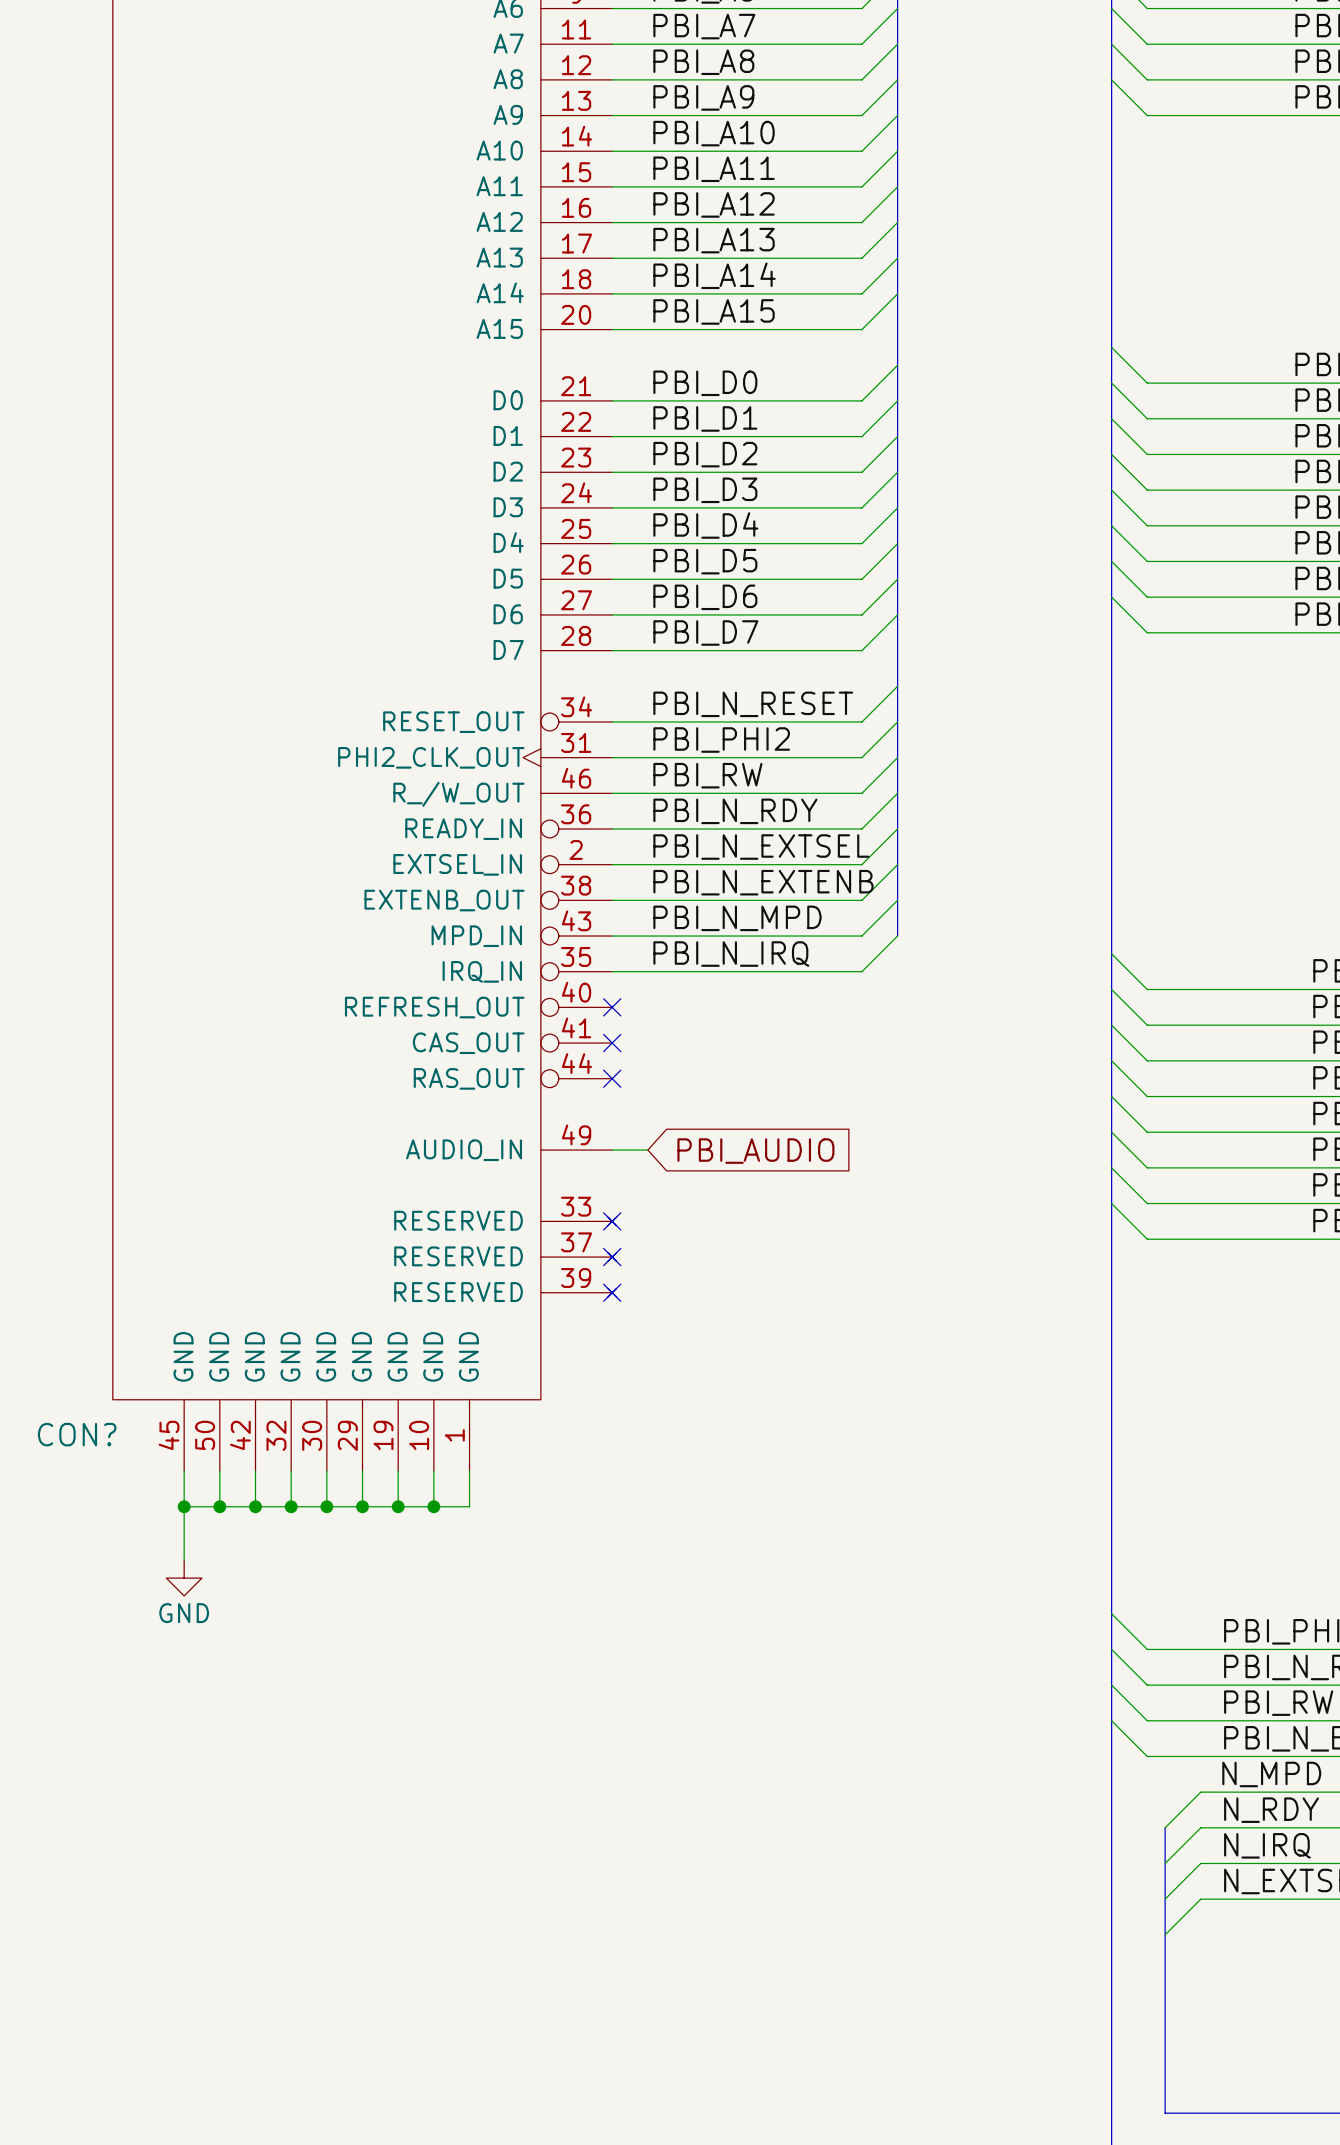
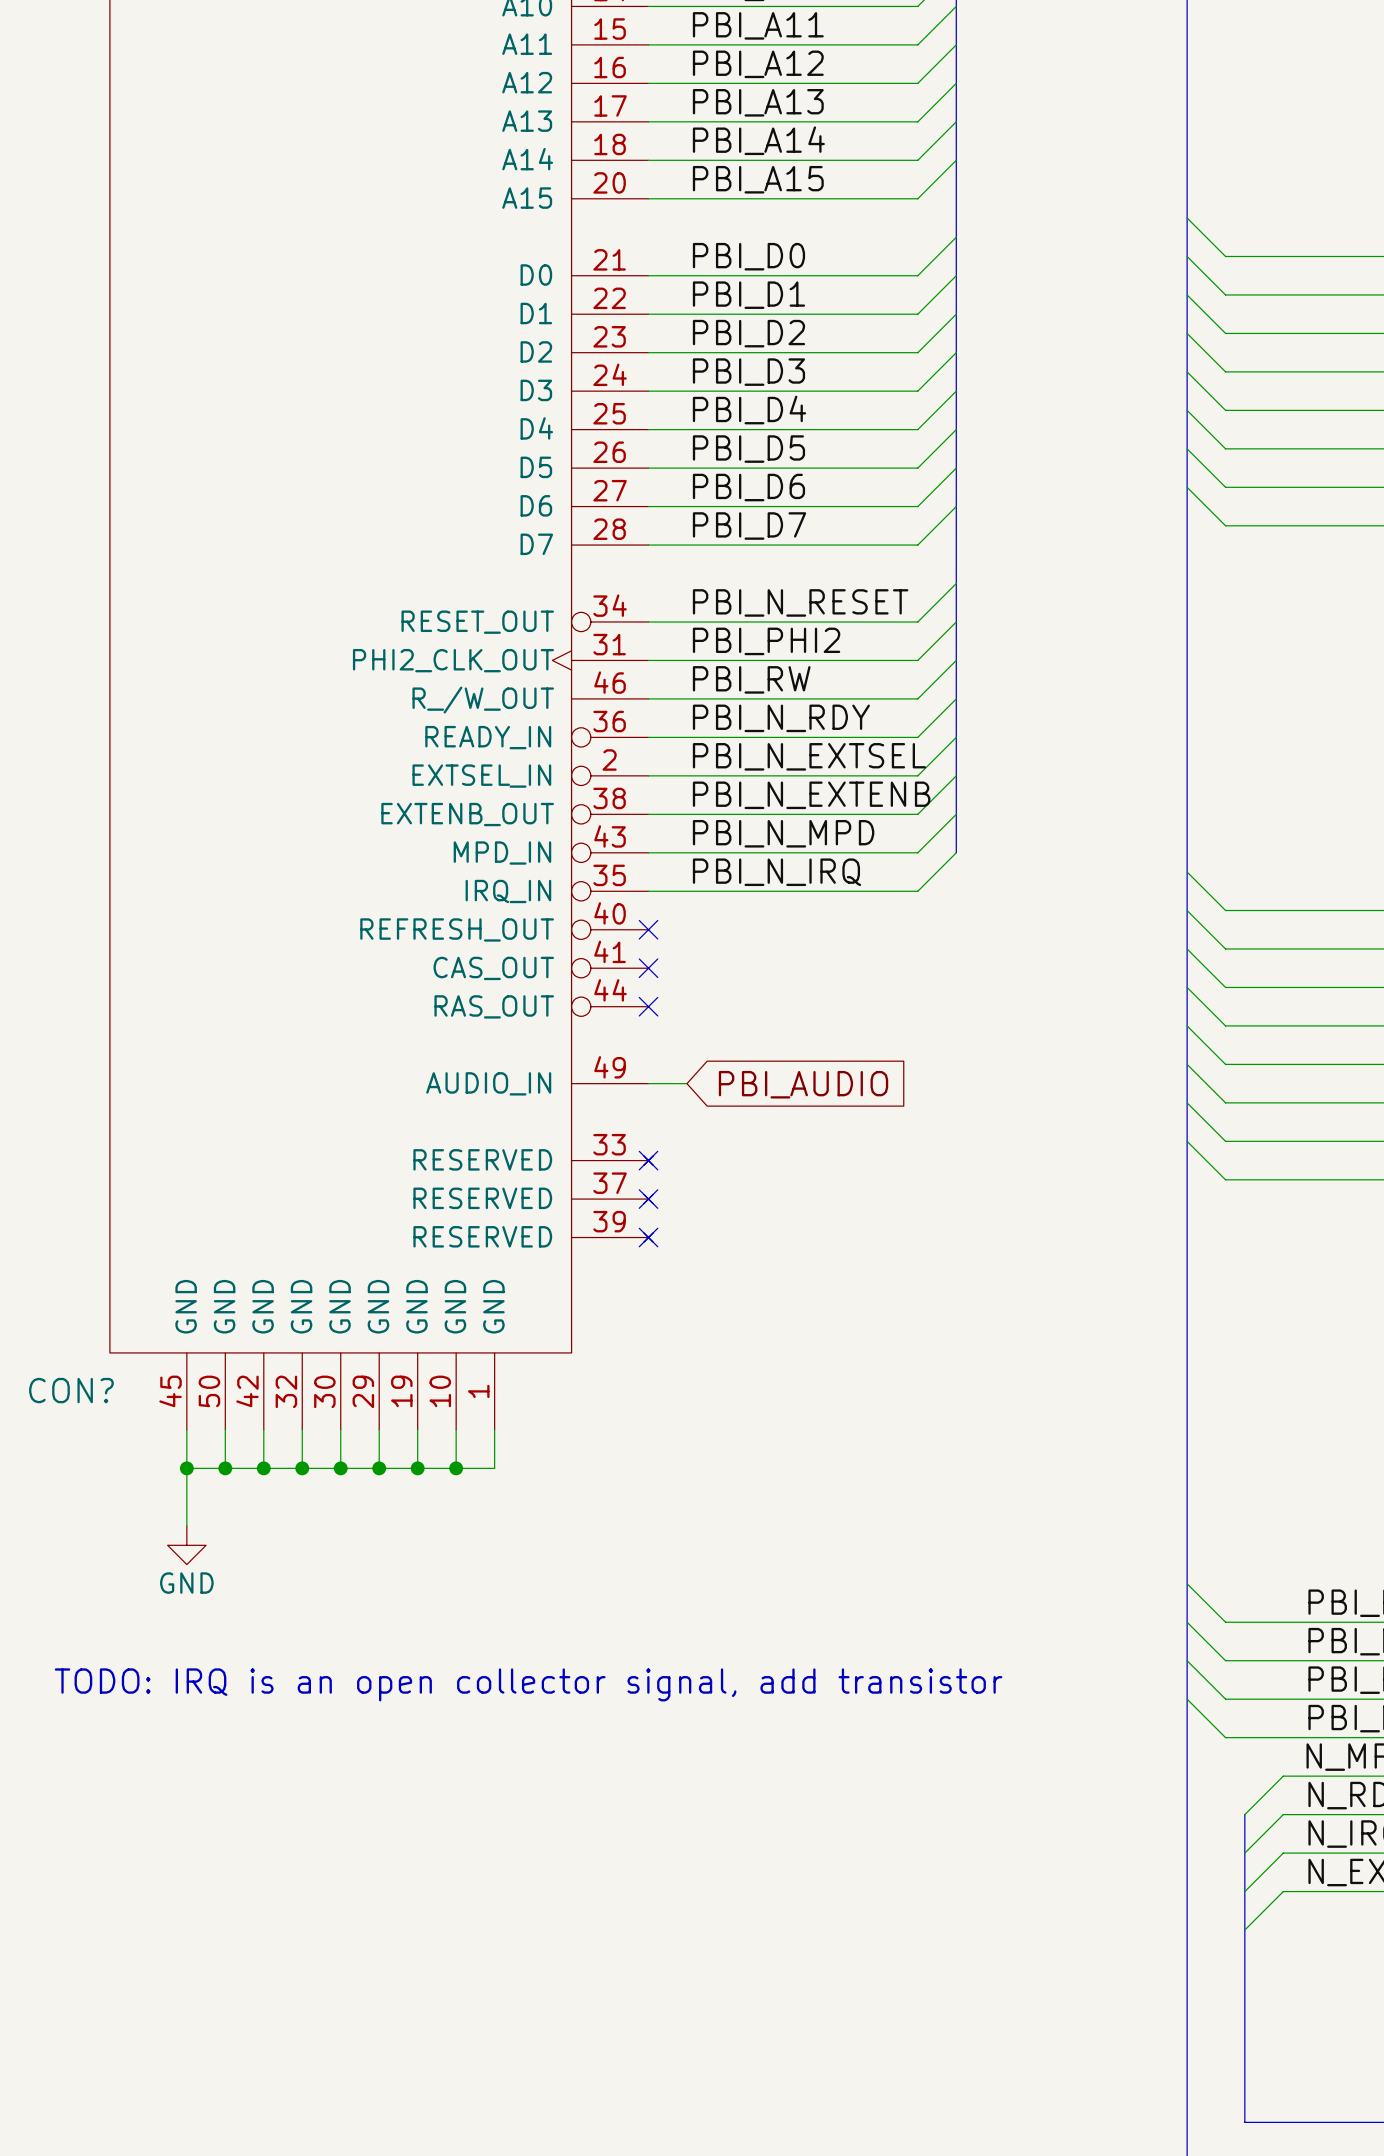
text: none -> TODO: IRQ is an open collector signal, add transistor (528, 1684)

